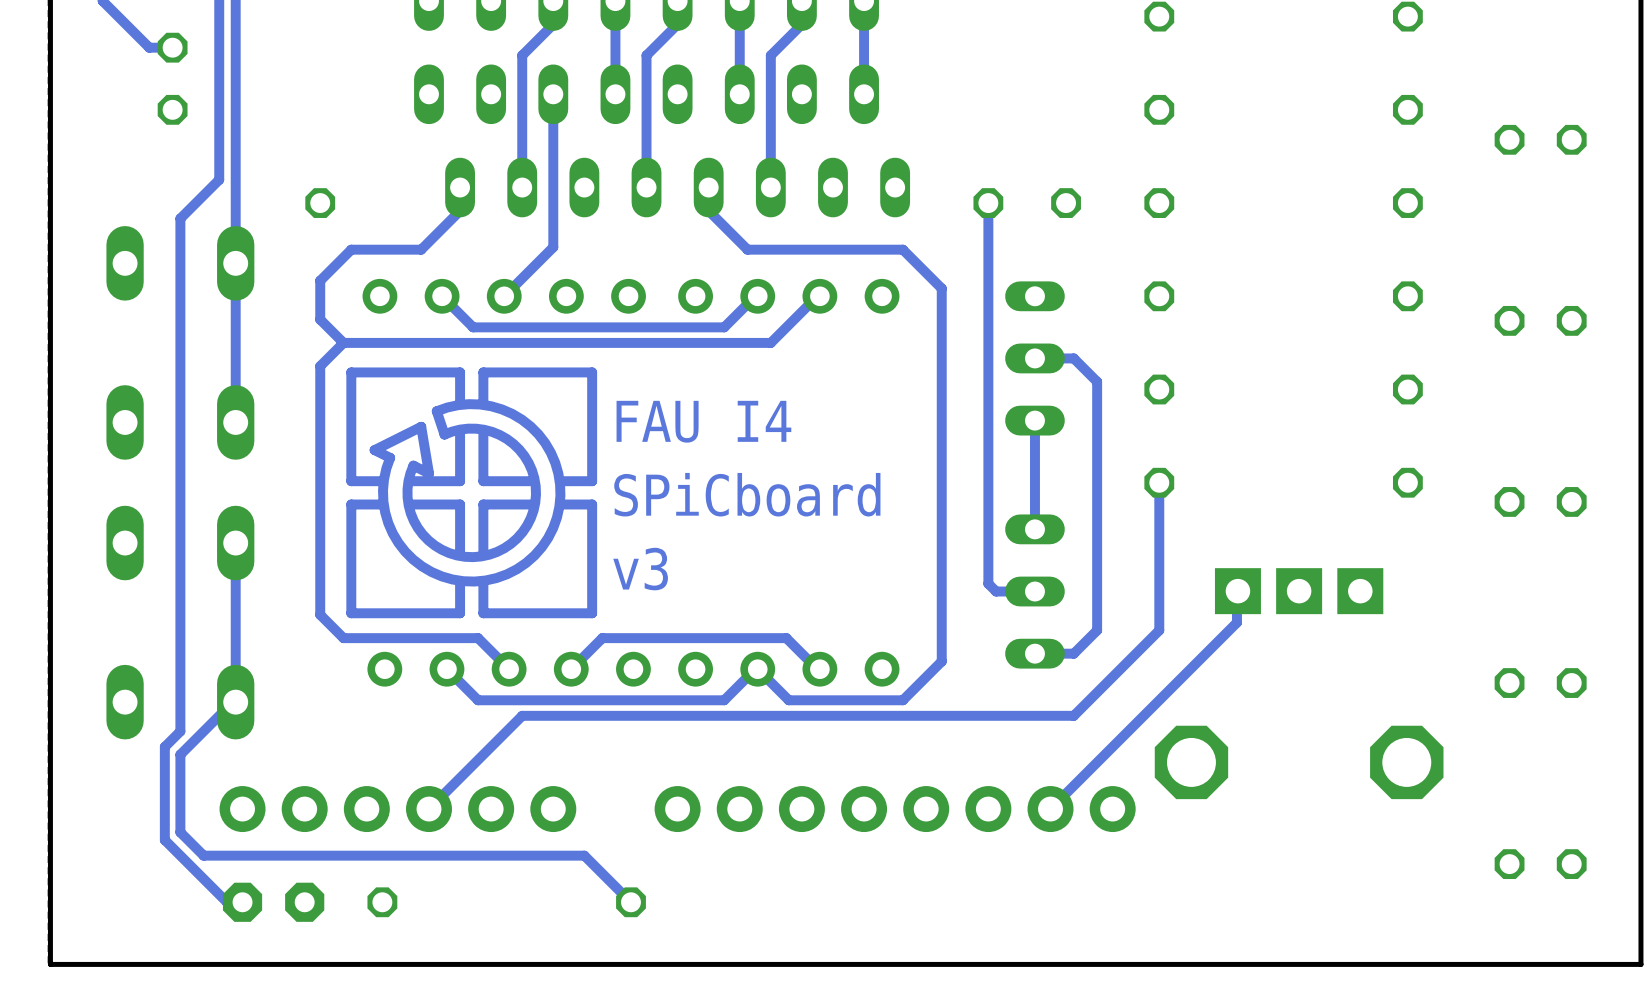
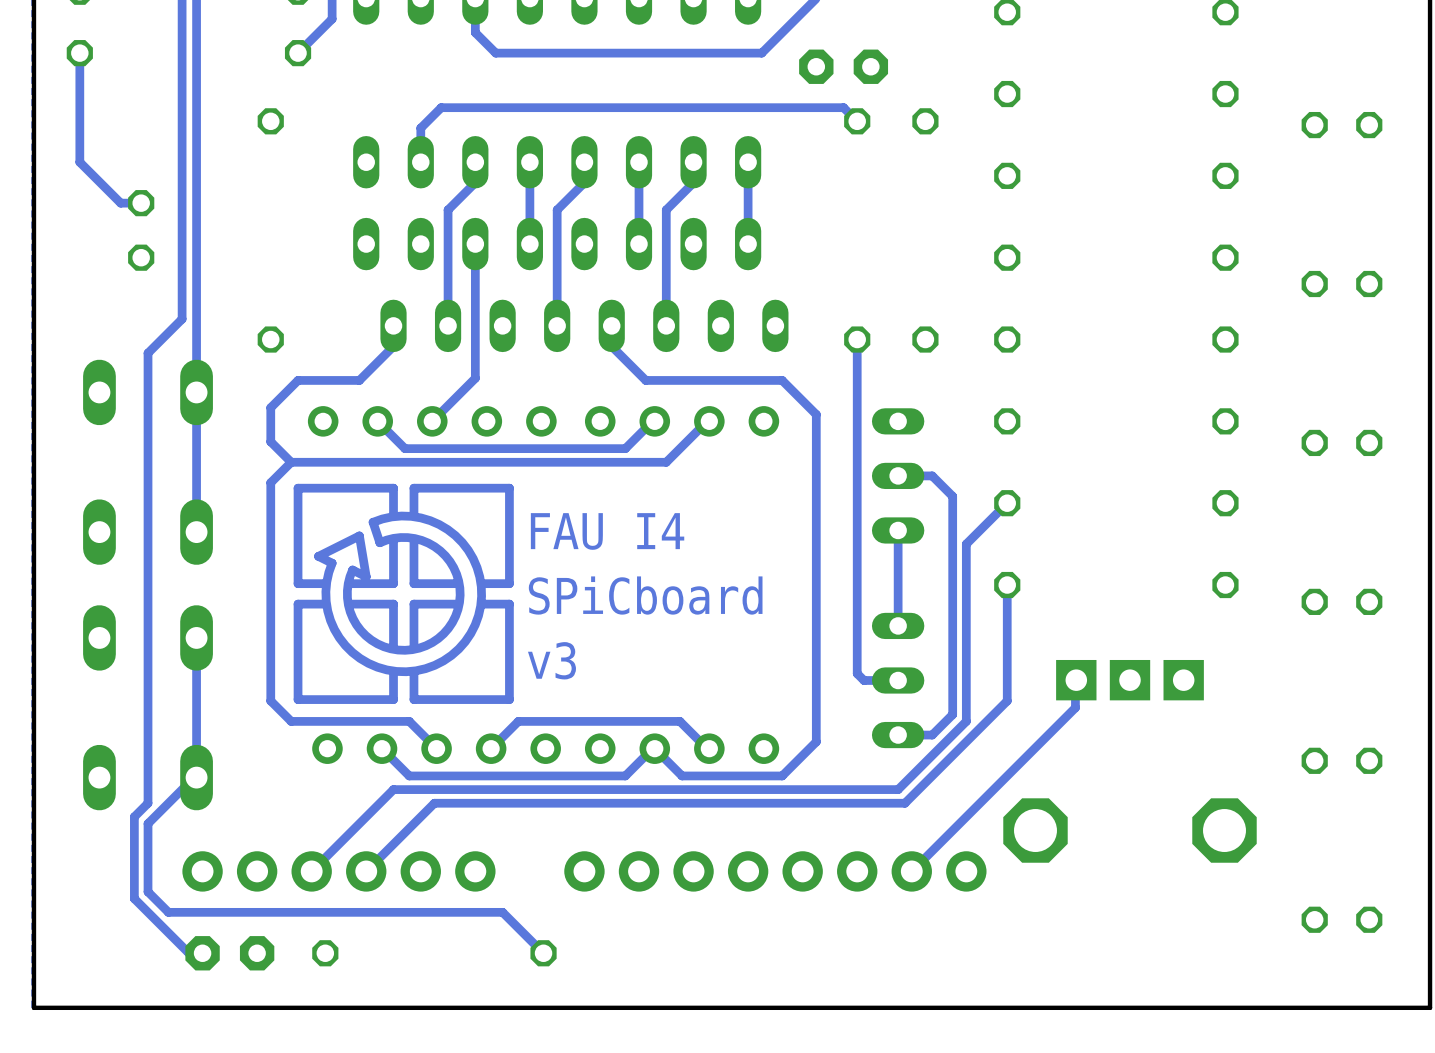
track: (1159, 614) (1159, 630) (1073, 715) (1034, 715) -> (1007, 503) (966, 544) (966, 721) (898, 789)
track: none -> (1007, 700) (904, 803) (434, 803)
track: (522, 715) (506, 731) -> (448, 789) (393, 789) (311, 871)

